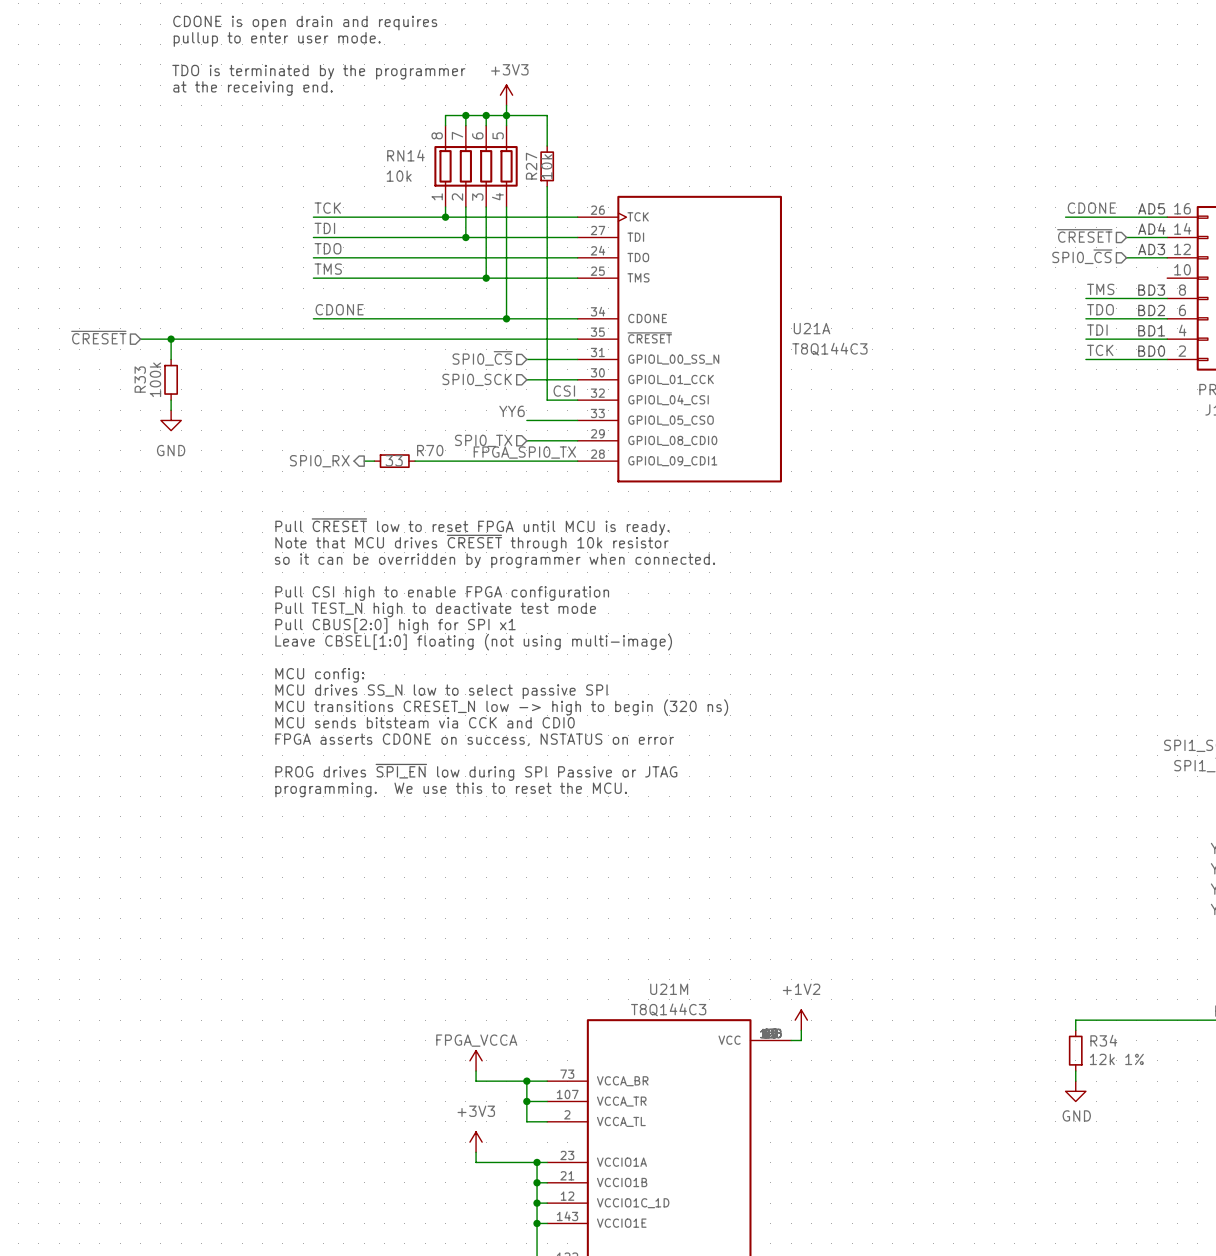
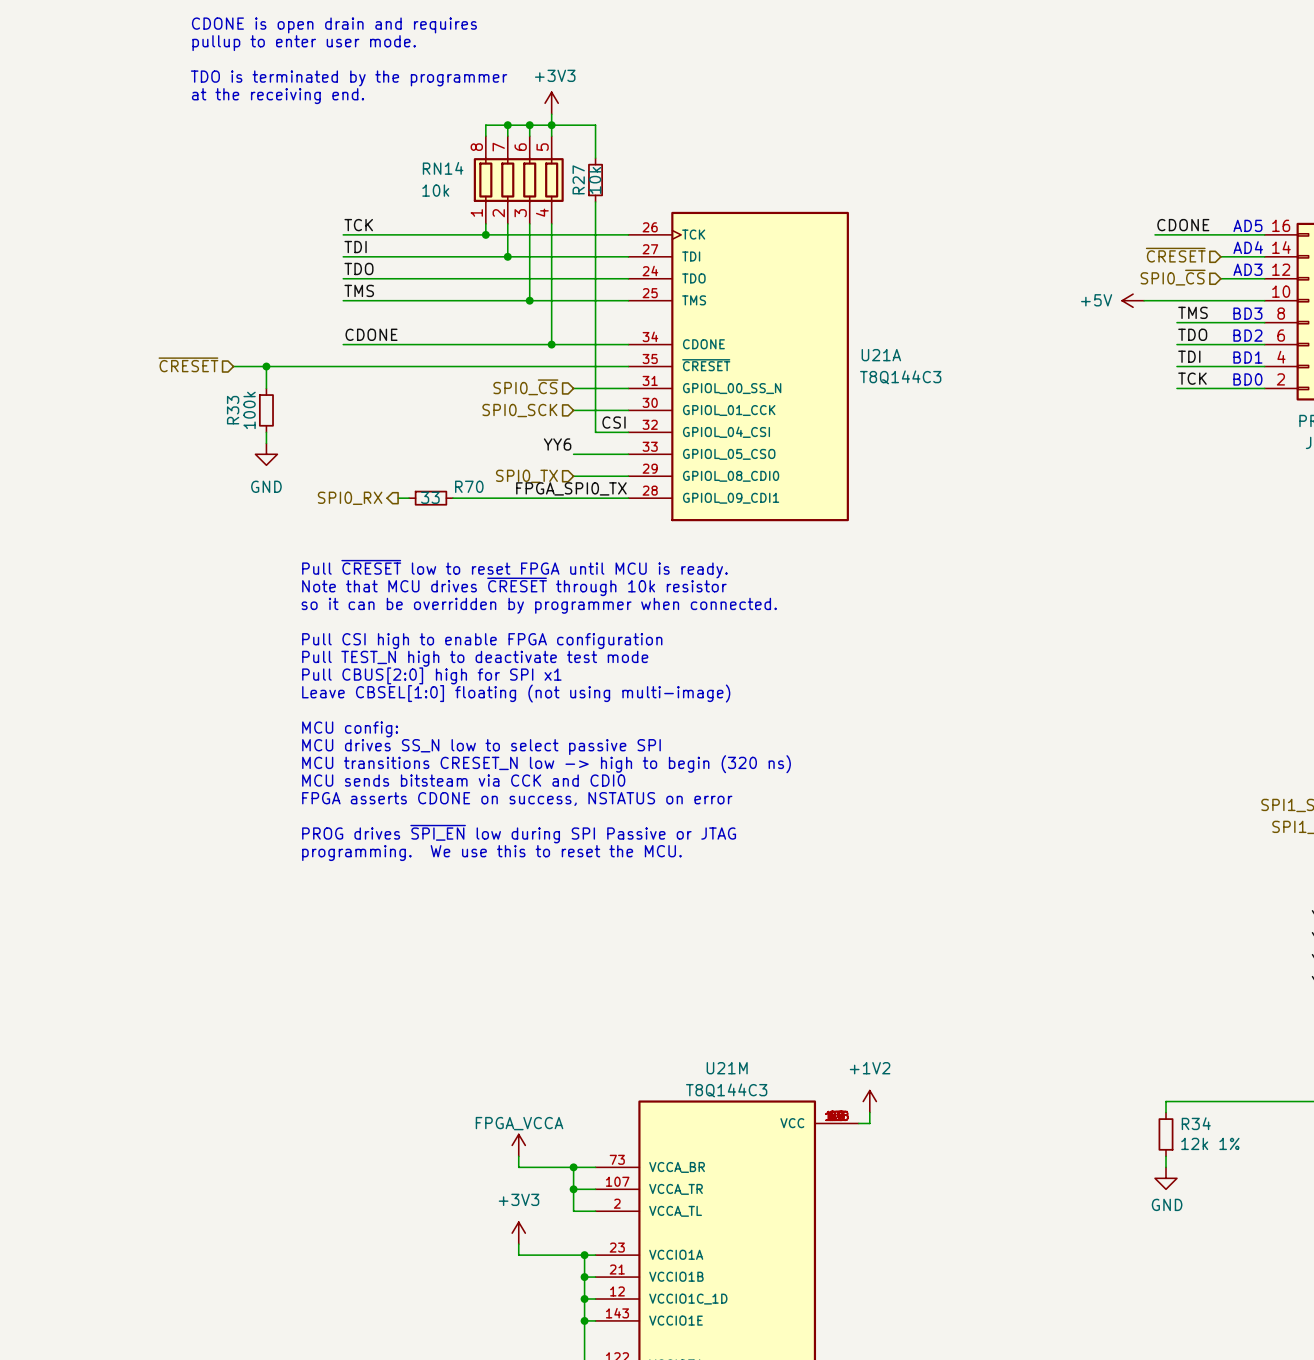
power symbol: none -> +5V (1133, 300)
wire: none -> (1144, 300) (1264, 300)
hierarchical label position: ~{CRESET} (98, 337) -> ~{CRESET} (188, 364)
wire: (140, 339) (211, 339) -> none
wire: (171, 339) (171, 359) -> (266, 366) (266, 388)
junction: (171, 339) -> none
junction: none -> (266, 366)
R33 position: (171, 379) -> (266, 410)
wire: (171, 400) (171, 410) -> (266, 432) (266, 443)
power symbol position: GND (171, 420) -> GND (266, 454)

